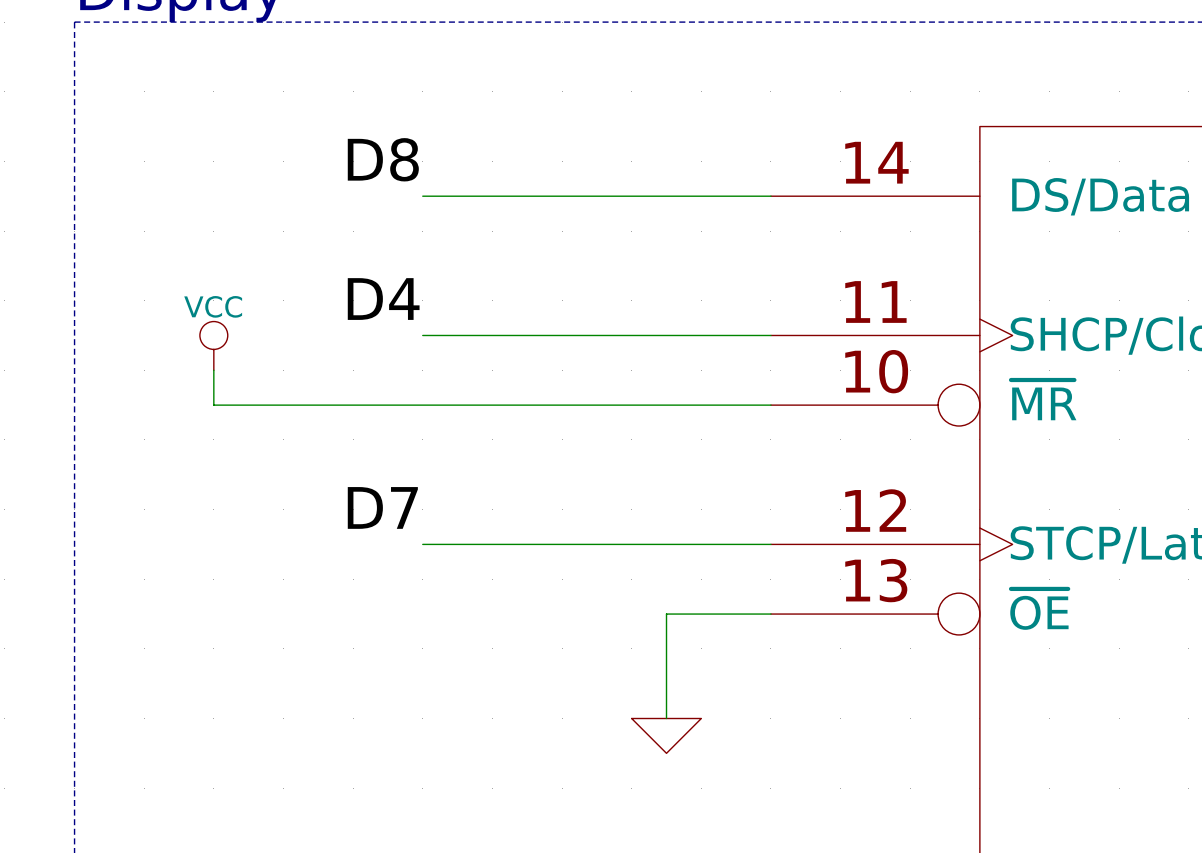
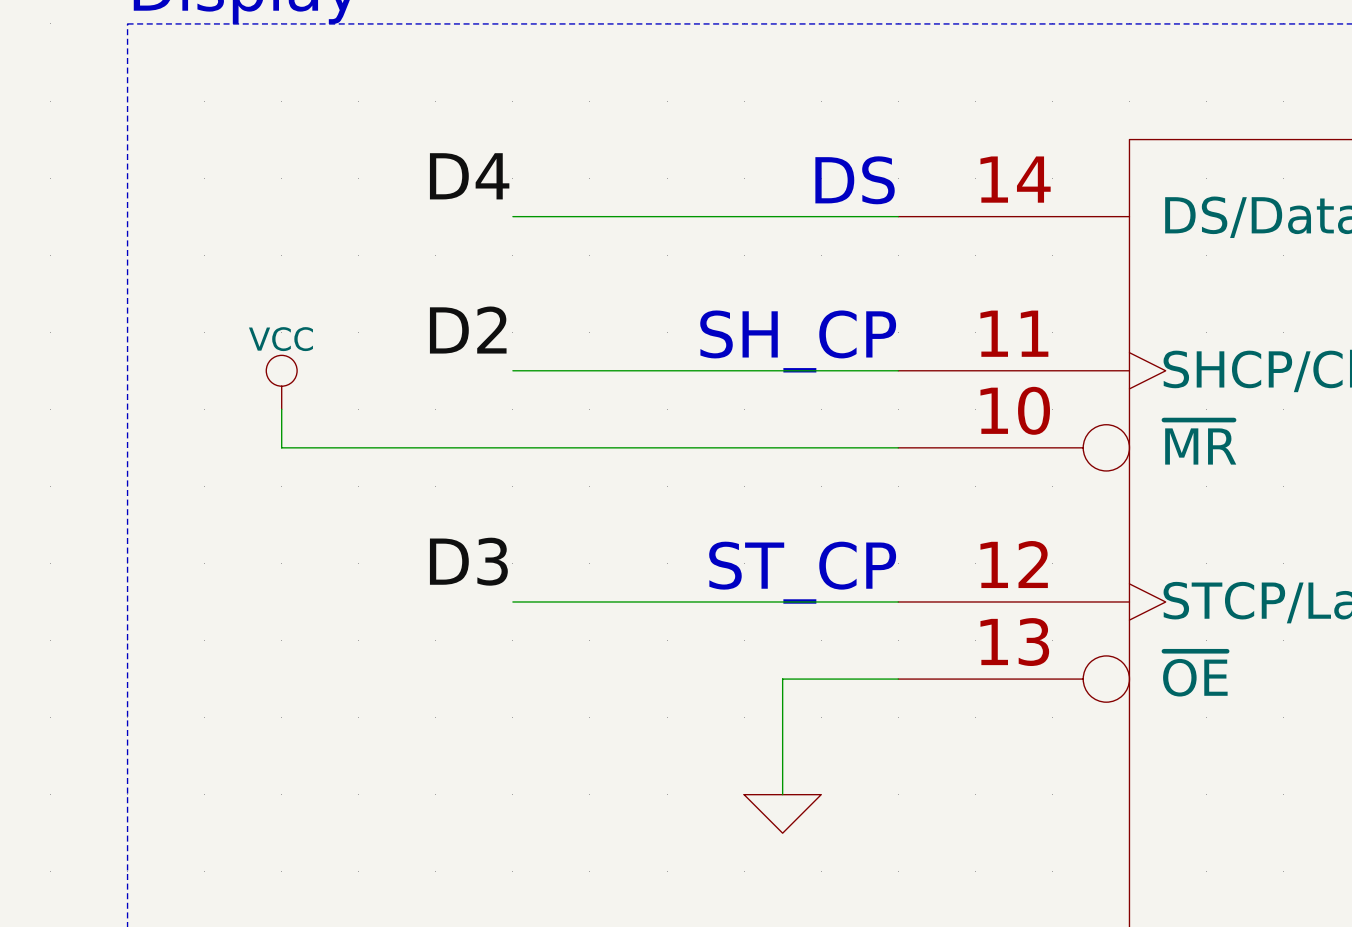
label: D8 (383, 159) -> D4 (469, 176)
text: none -> DS (855, 180)
label: D4 (383, 299) -> D2 (468, 330)
text: none -> SH_CP (798, 341)
label: D7 (382, 507) -> D3 (468, 561)
text: none -> ST_CP (802, 572)

